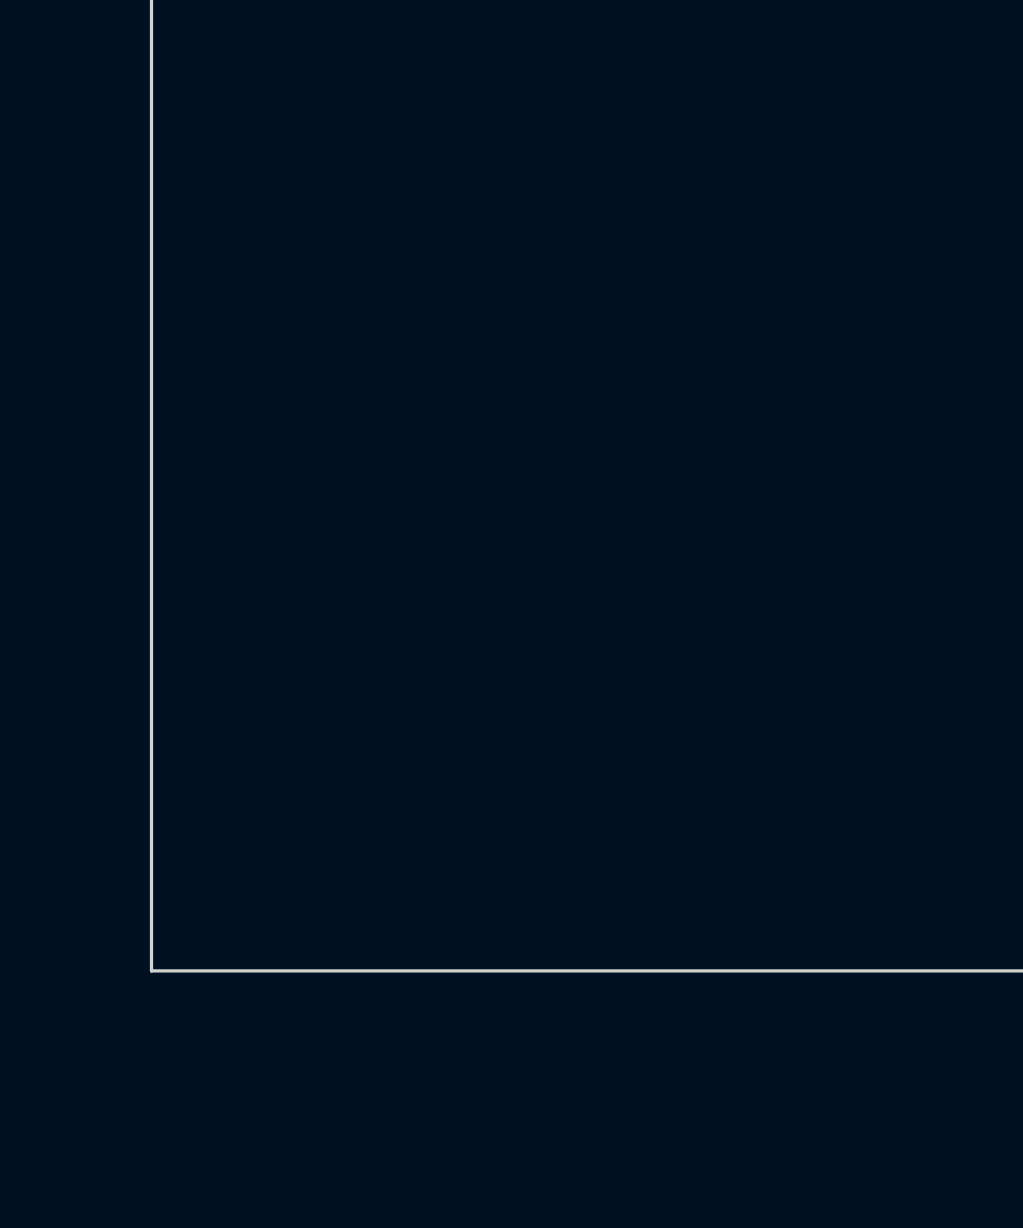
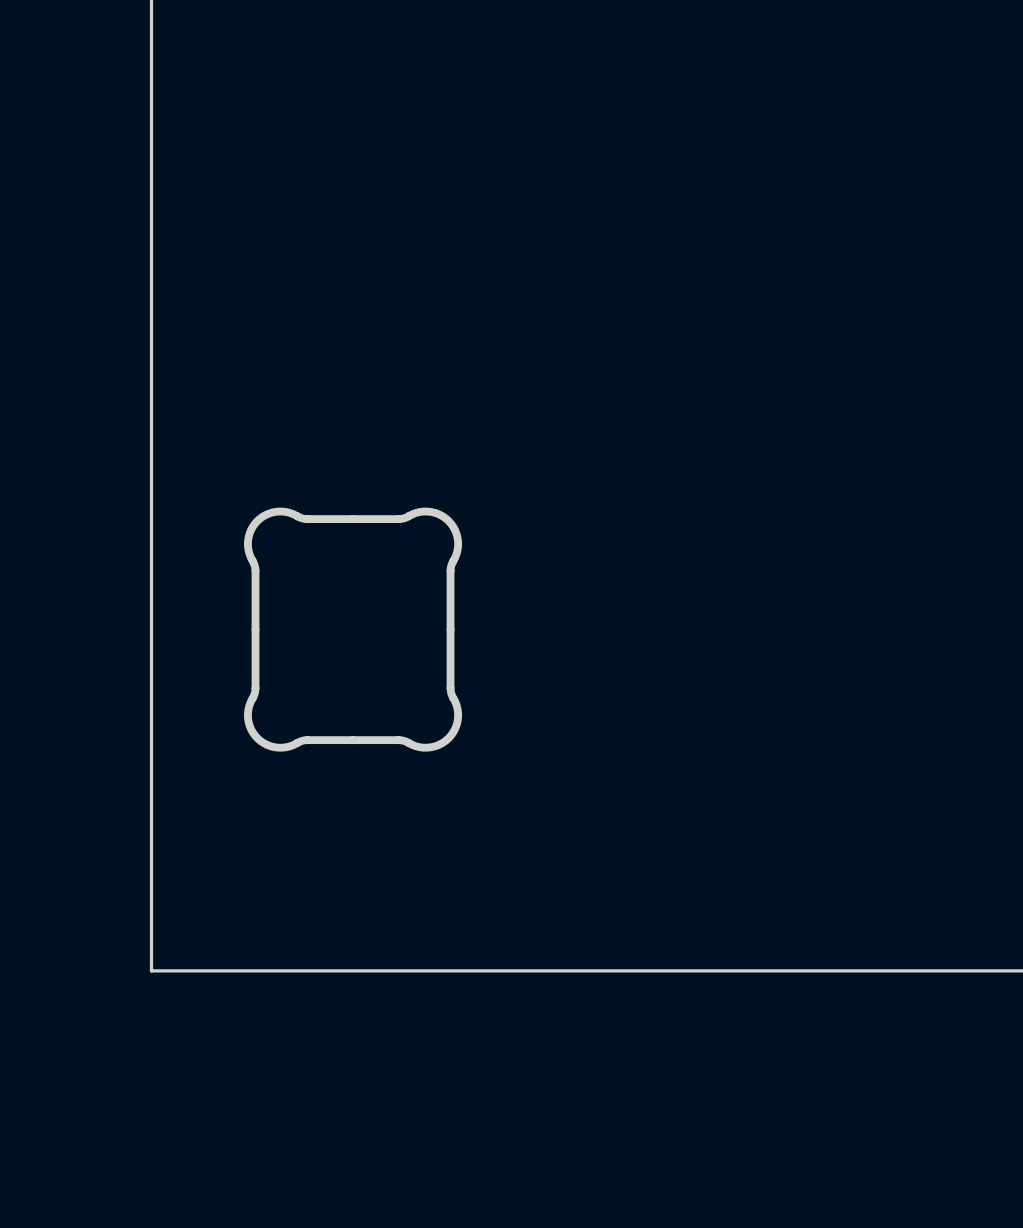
part: none -> (353, 629)

